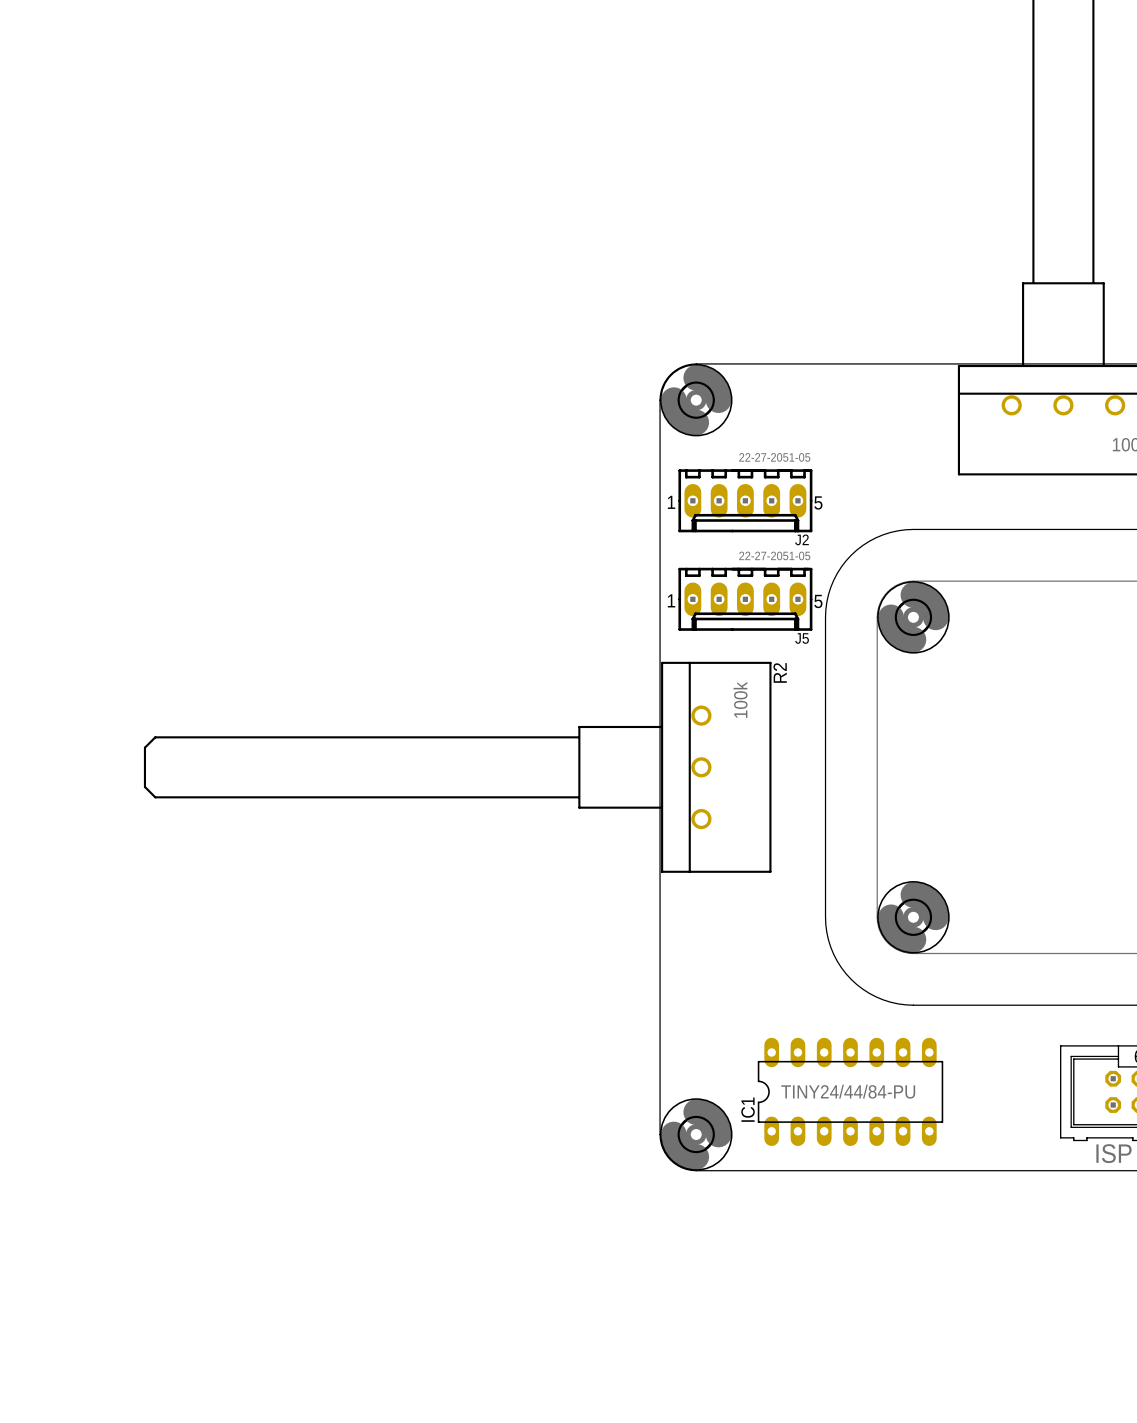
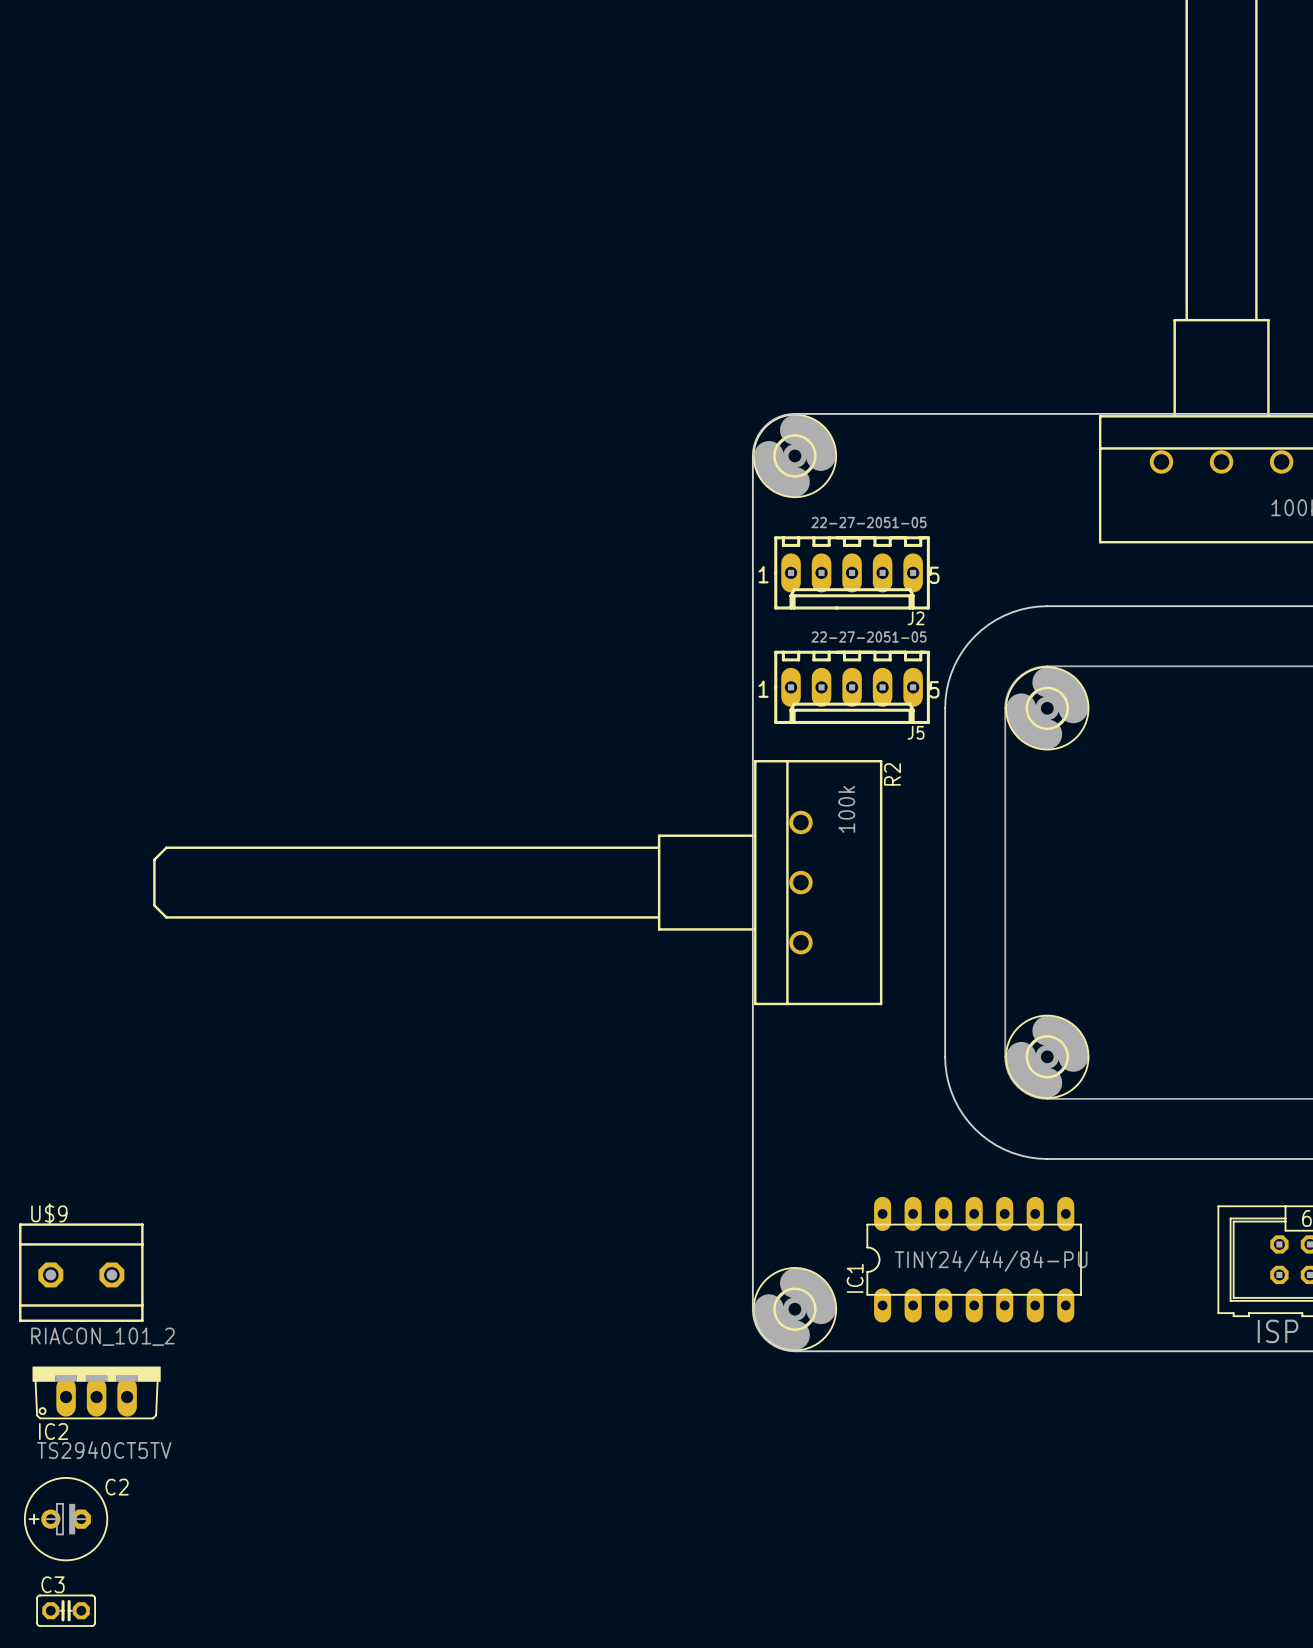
U$9: none -> RIACON_101_2 (81, 1272)
IC2: none -> TS2940CT5TV (96, 1392)
C2: none -> (66, 1519)
C3: none -> (66, 1610)

